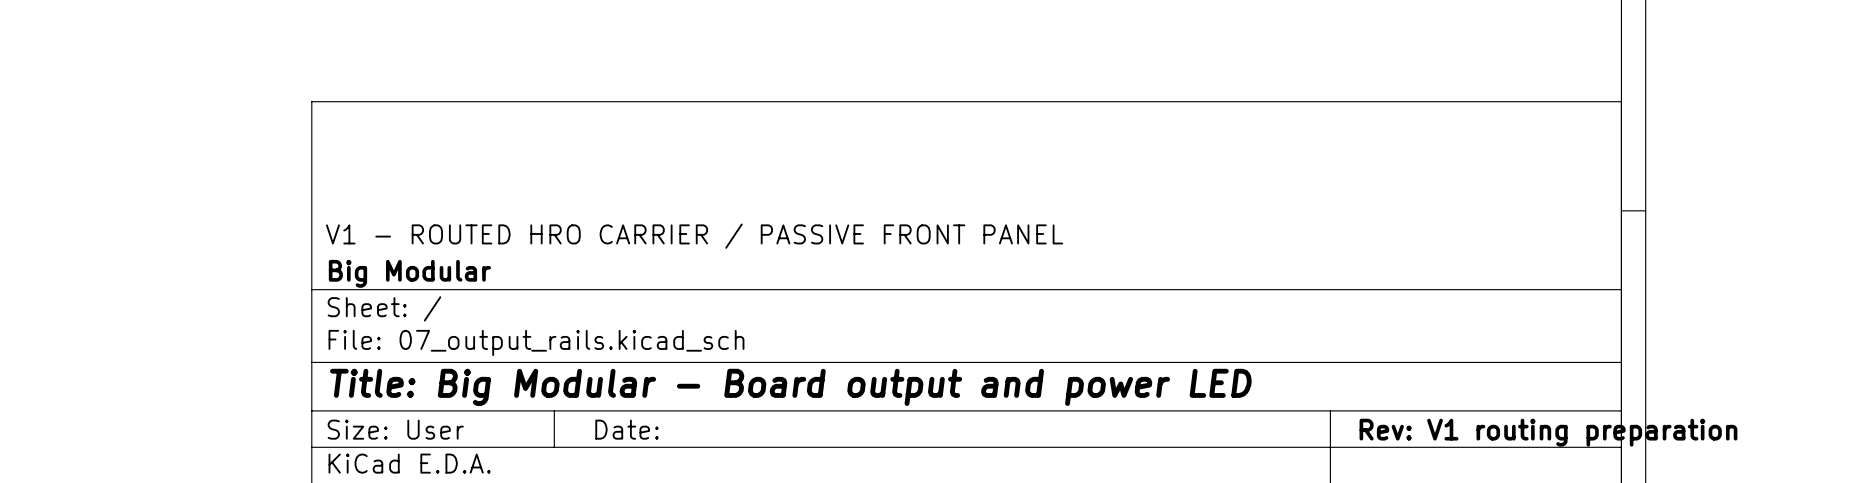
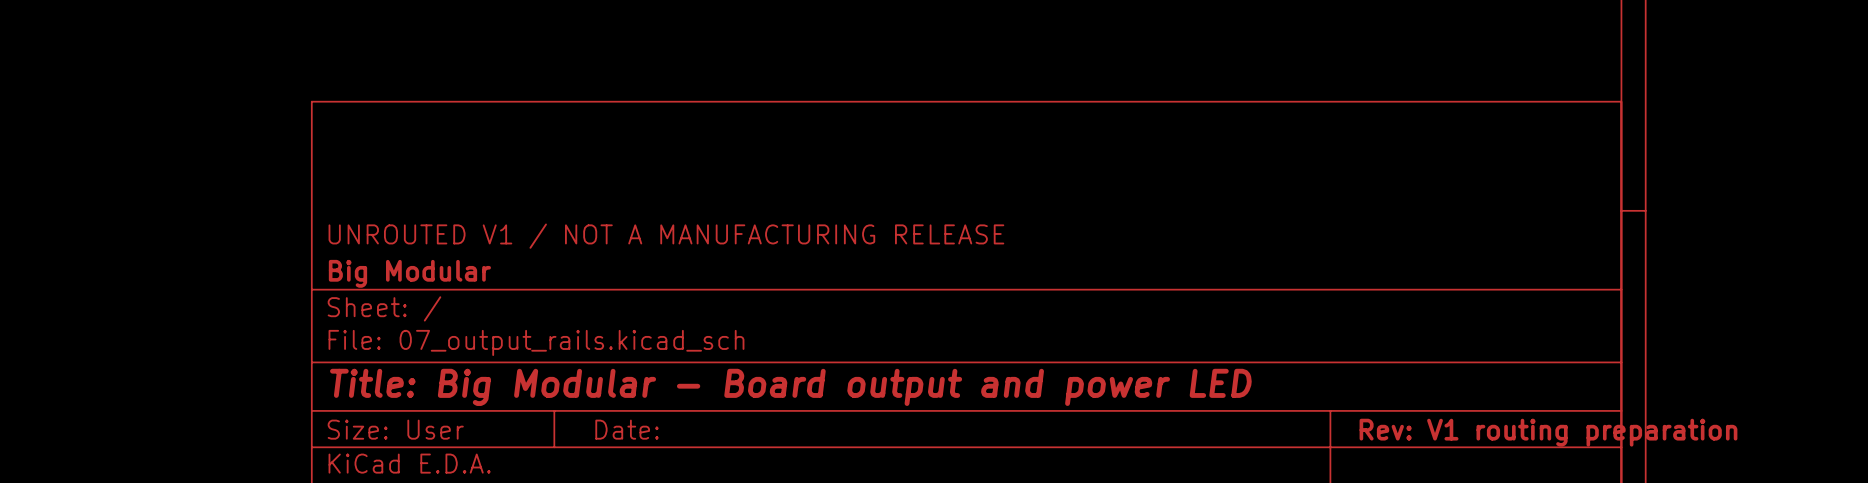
title block: V1 - ROUTED HRO CARRIER / PASSIVE FRONT PANEL (694, 236) -> UNROUTED V1 / NOT A MANUFACTURING RELEASE (666, 236)

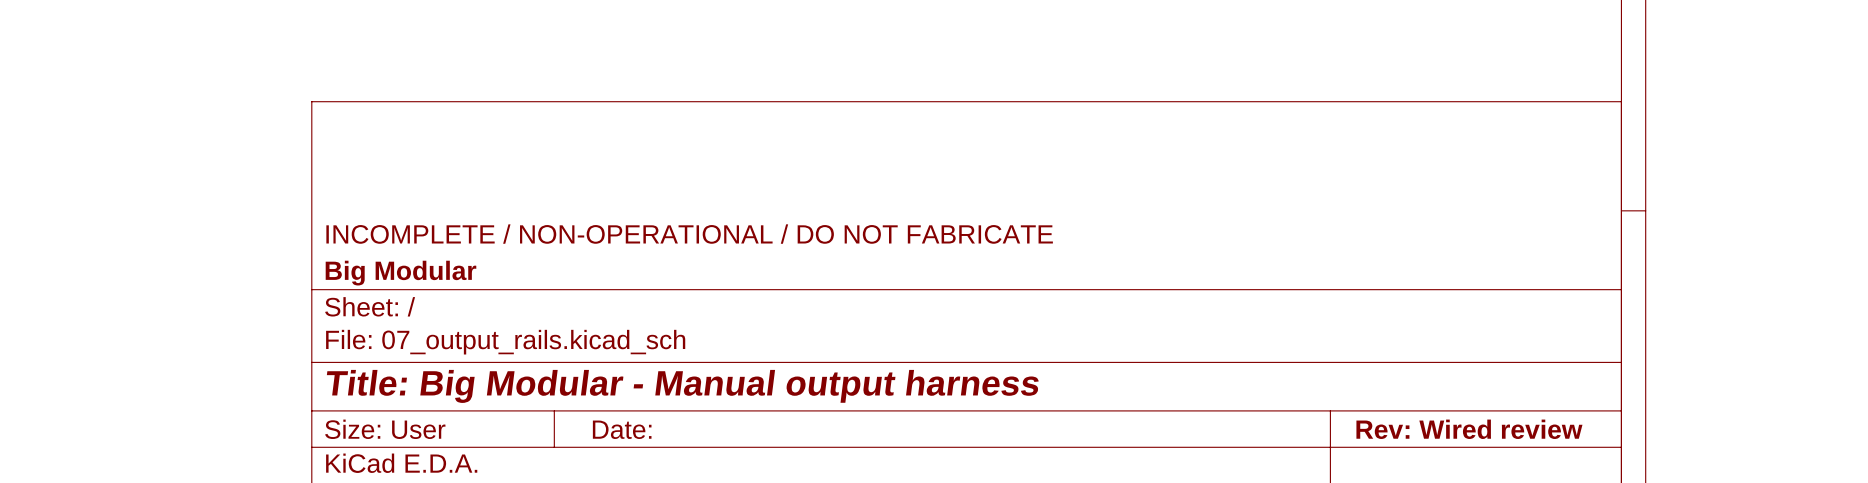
title block: UNROUTED V1 / NOT A MANUFACTURING RELEASE (666, 236) -> INCOMPLETE / NON-OPERATIONAL / DO NOT FABRICATE (689, 234)
title block: Title: Big Modular - Board output and power LED (790, 387) -> Title: Big Modular - Manual output harness (682, 386)
title block: Rev: V1 routing preparation (1548, 432) -> Rev: Wired review (1469, 429)

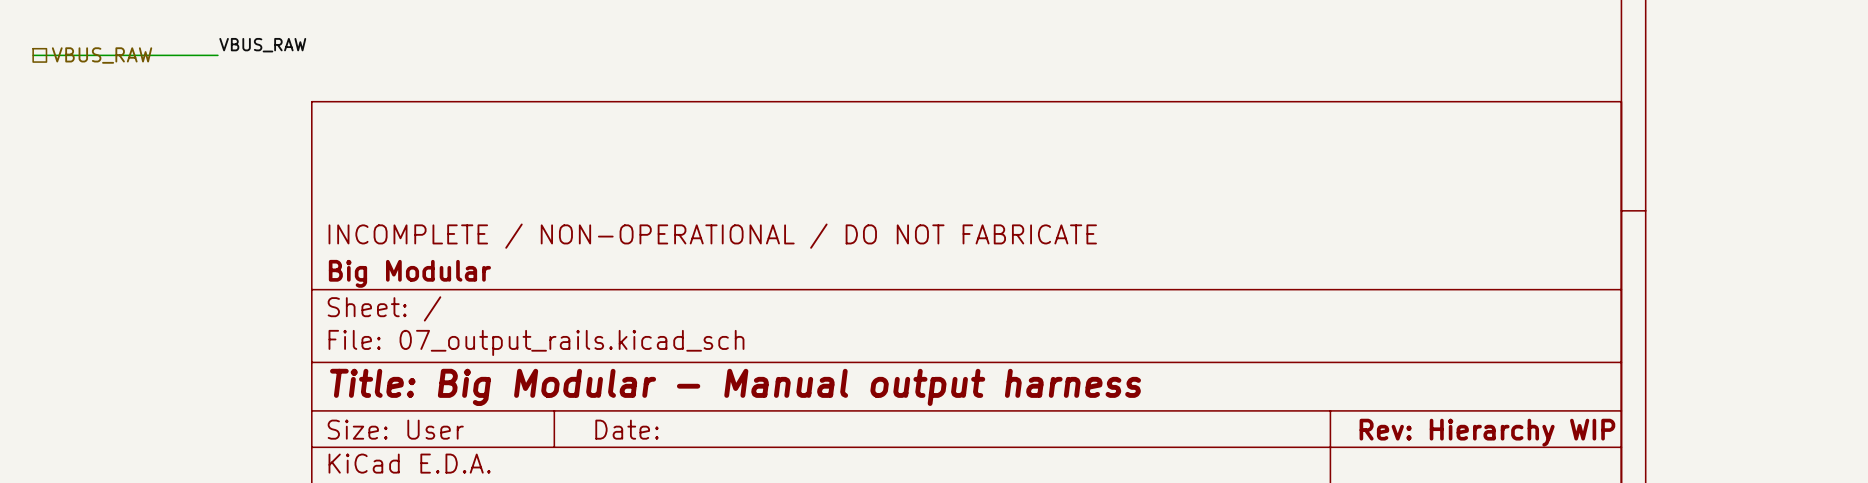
label: none -> VBUS_RAW (262, 45)
wire: none -> (33, 55) (217, 55)
hierarchical label: none -> VBUS_RAW (102, 55)
title block: Rev: Wired review (1469, 429) -> Rev: Hierarchy WIP (1487, 432)

